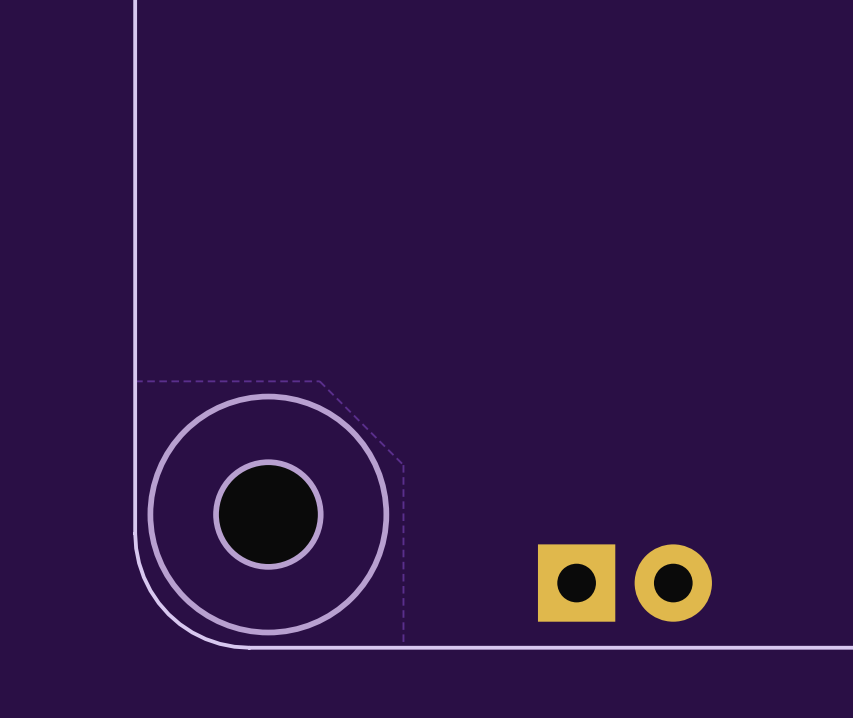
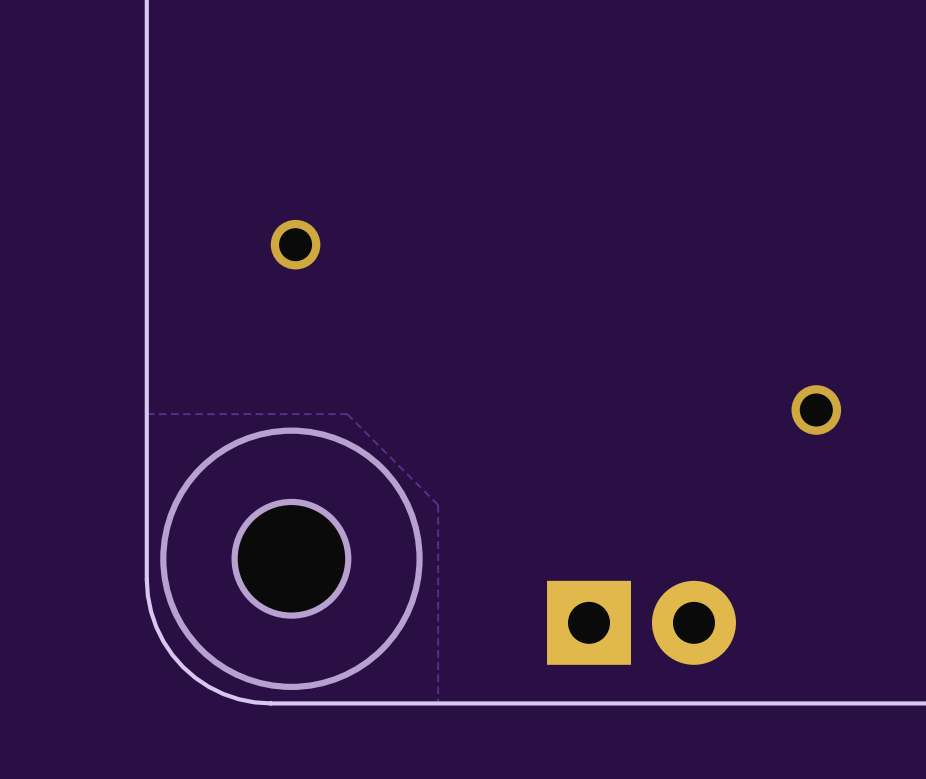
via: none -> (295, 244)
via: none -> (816, 410)
part position: (624, 583) -> (641, 622)

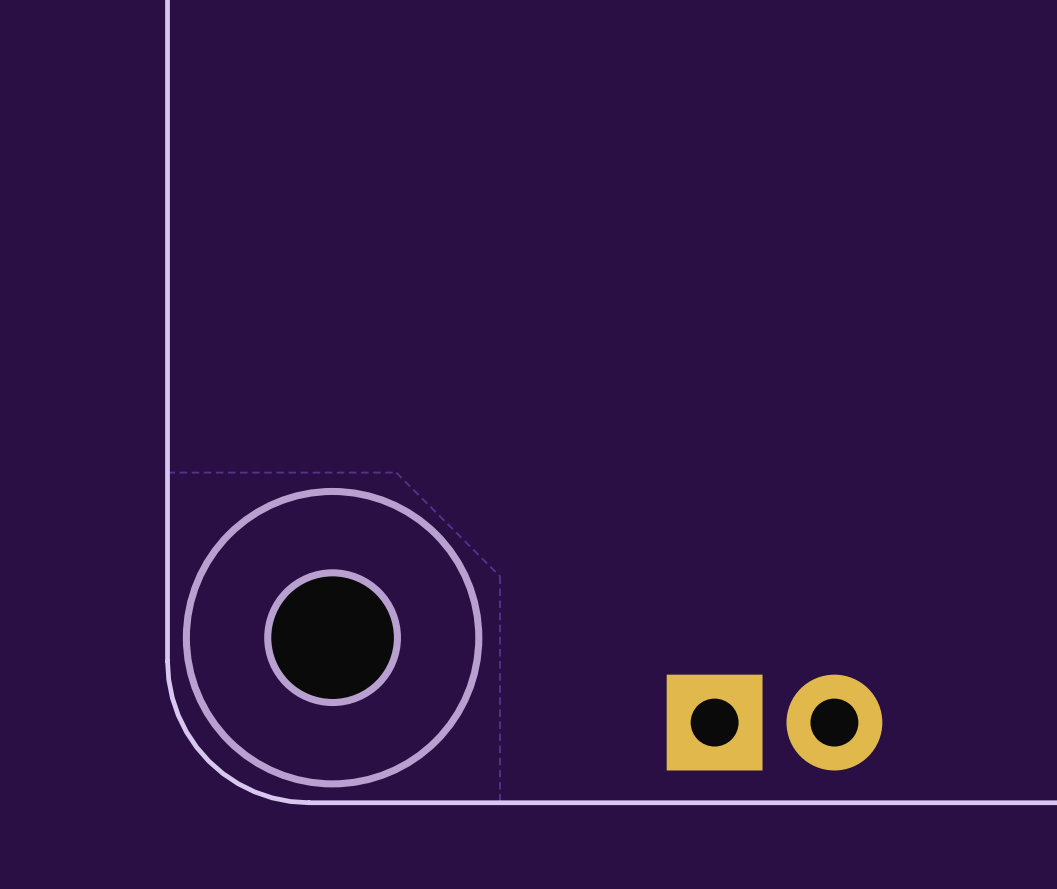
via: (295, 244) -> none
via: (816, 410) -> none
part position: (641, 622) -> (774, 722)

